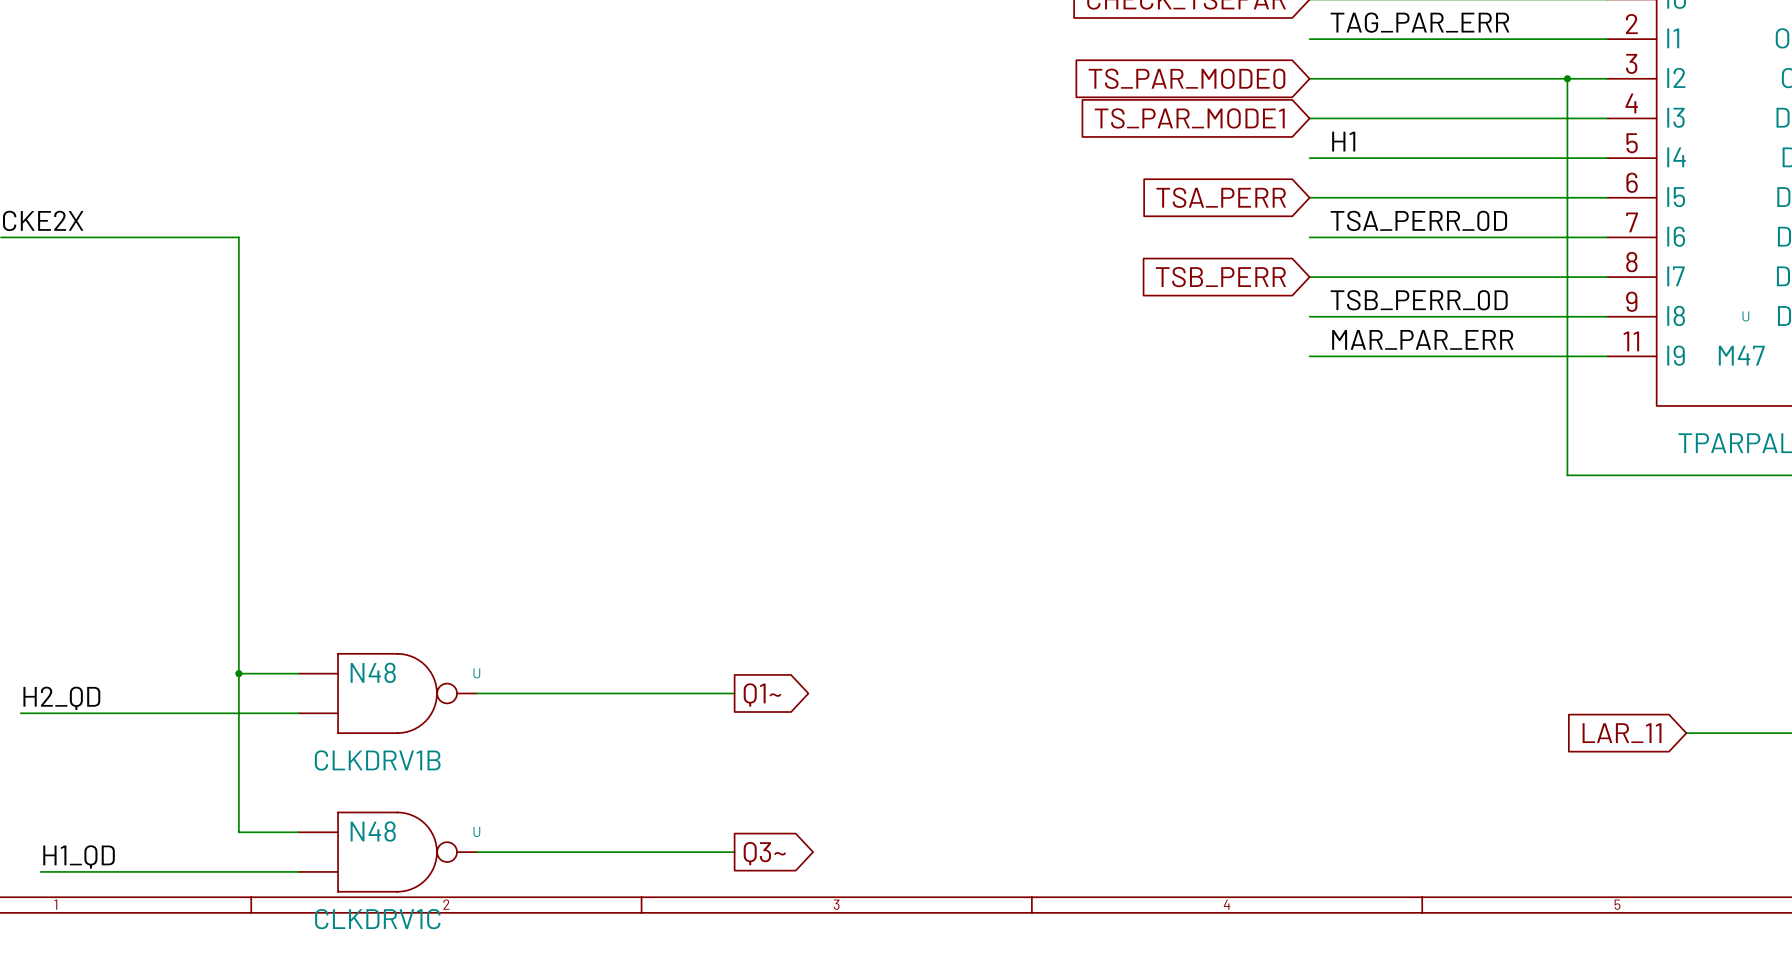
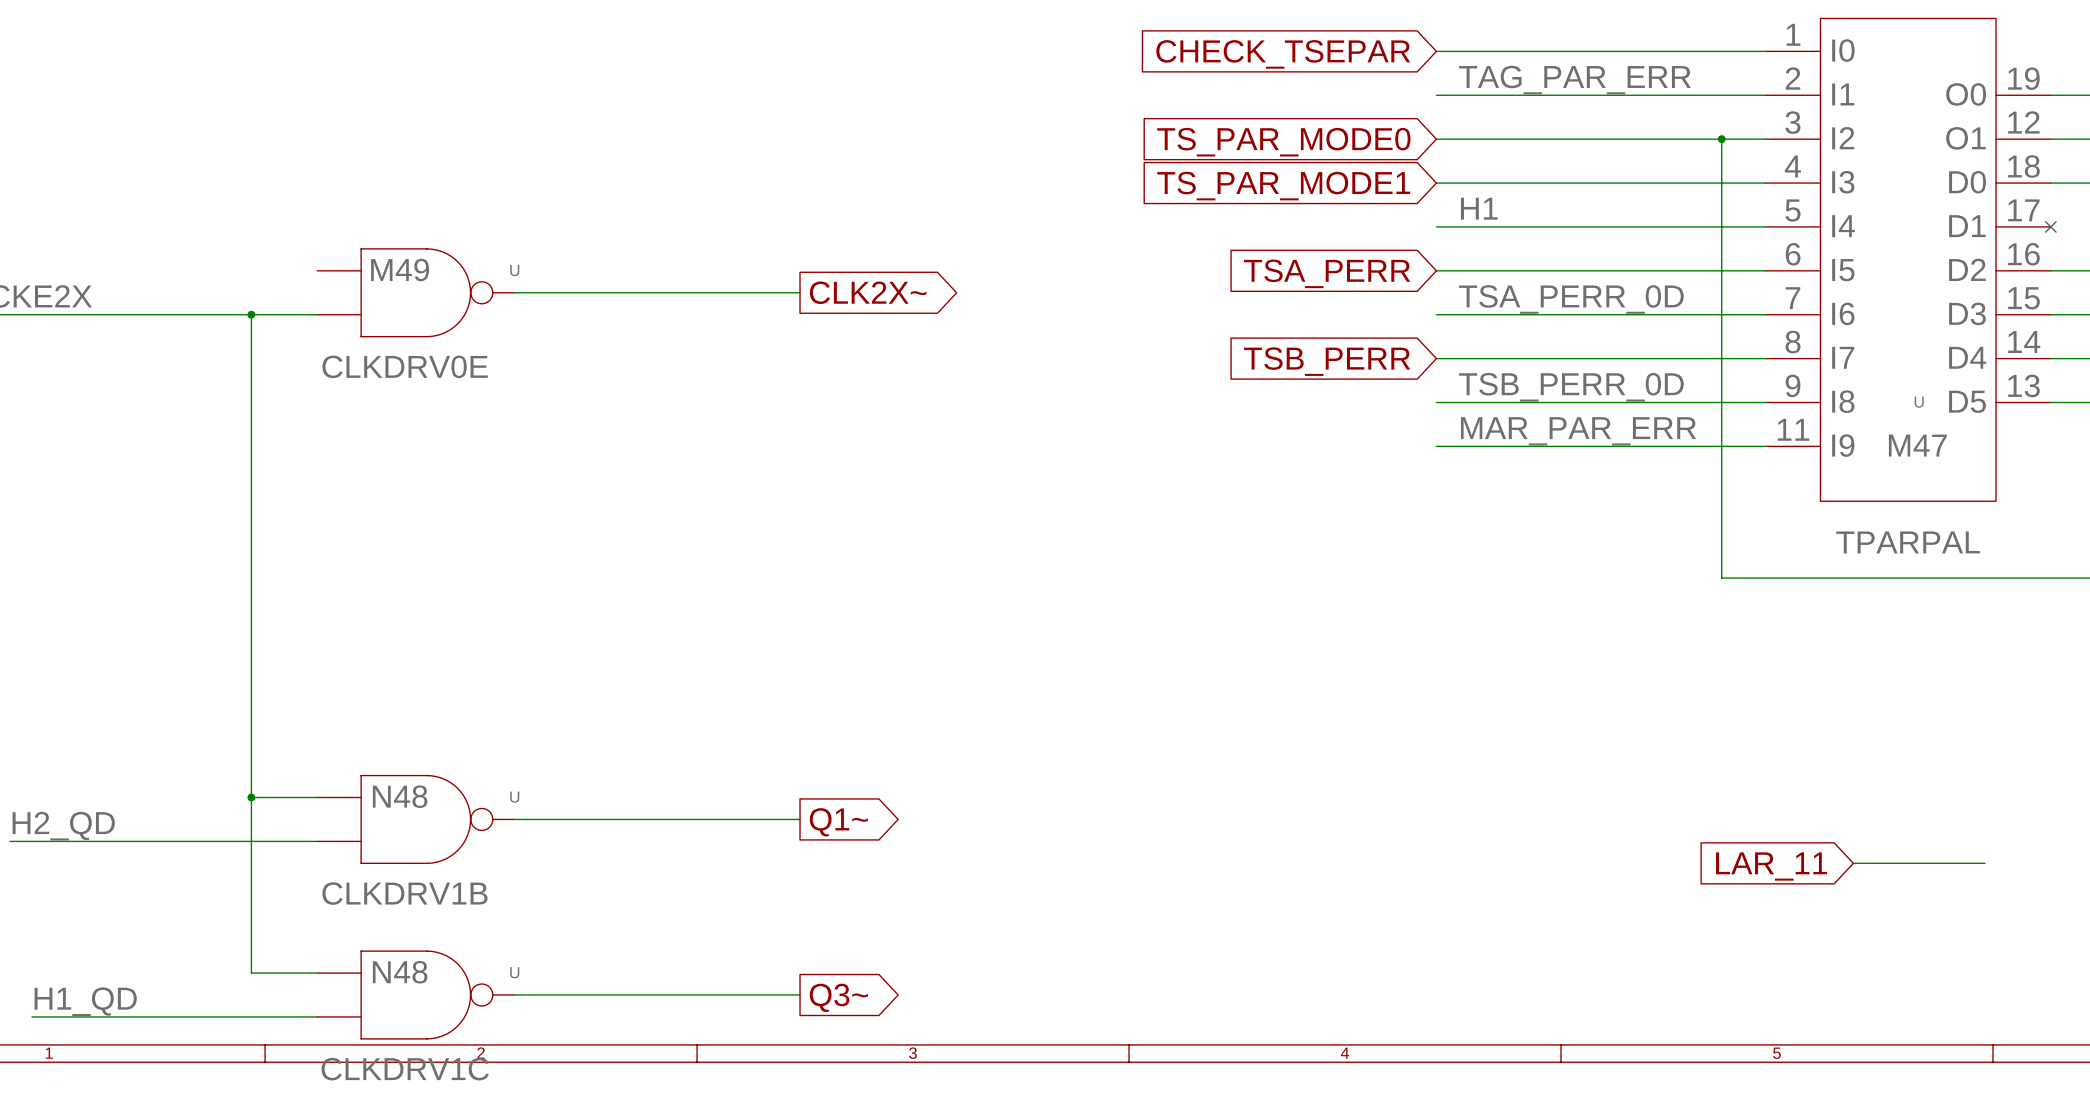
U: none -> (415, 292)
wire: none -> (514, 292) (800, 292)
global label: none -> CLK2X~ (868, 292)
wire: none -> (251, 314) (317, 314)
junction: none -> (251, 314)

